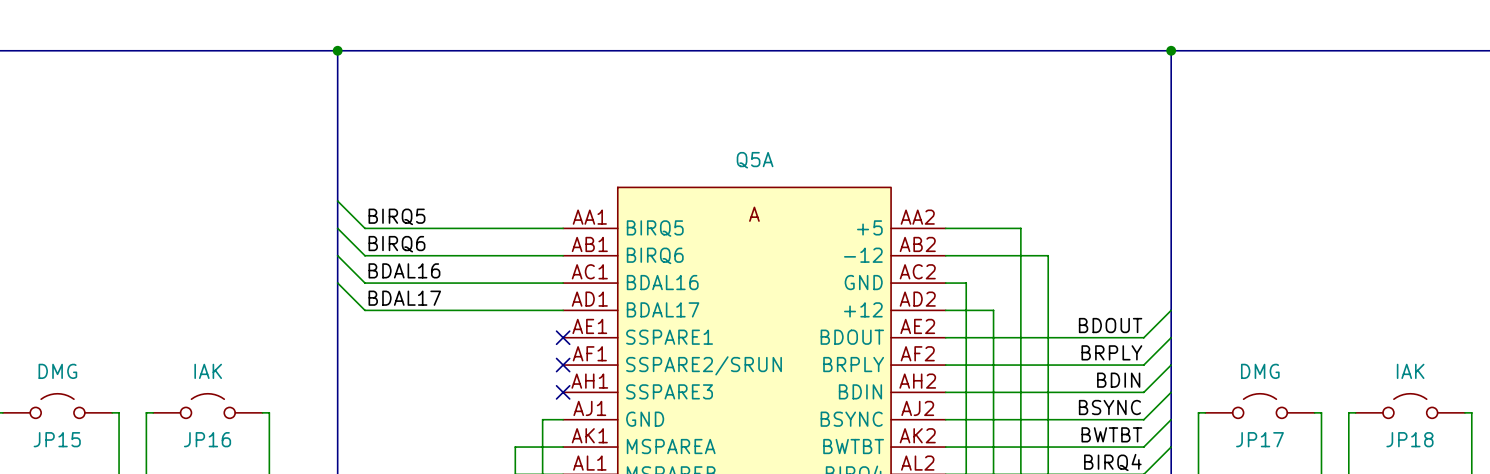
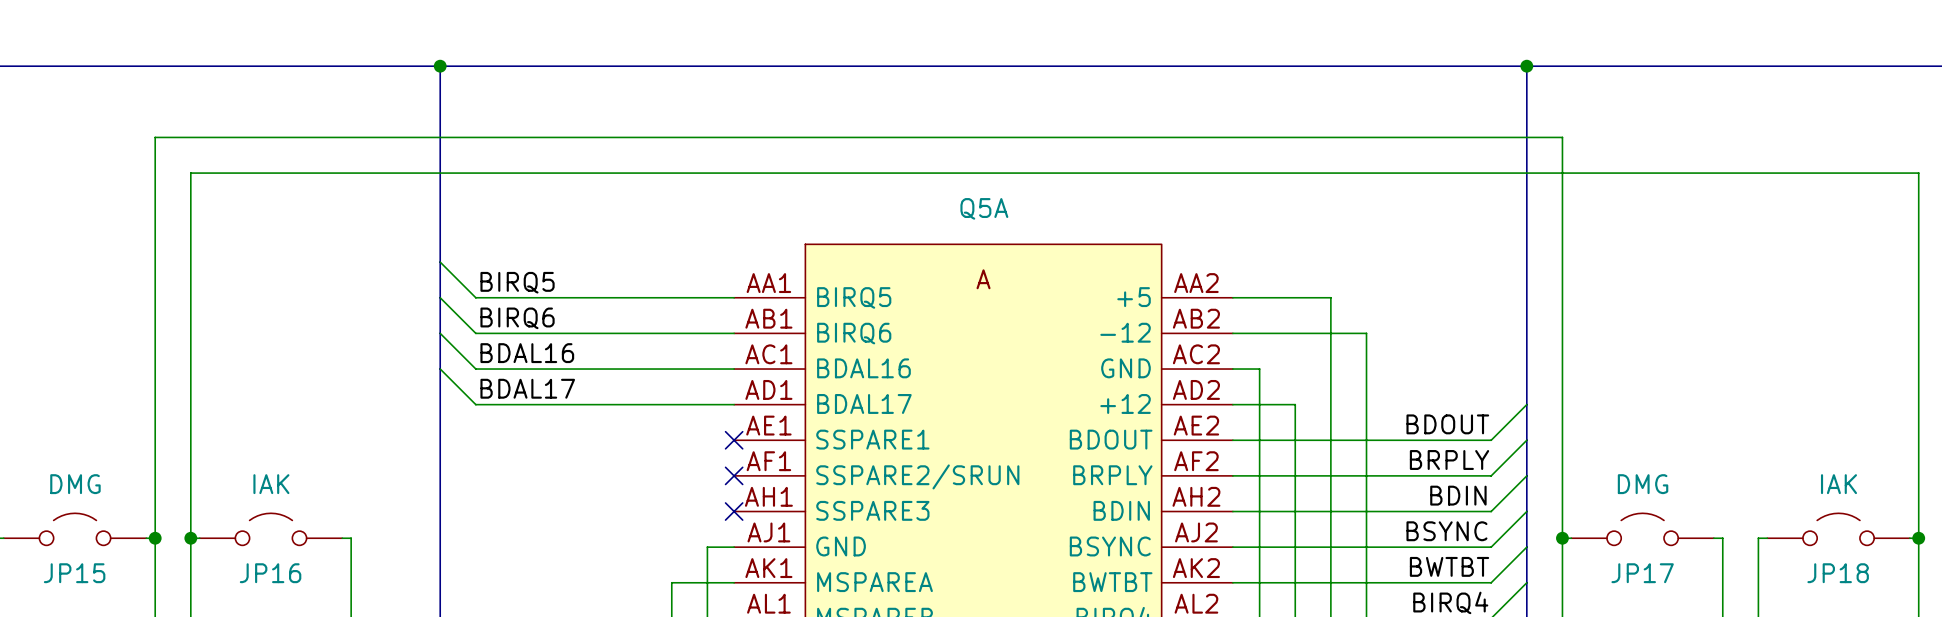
wire: none -> (155, 538) (155, 137) (1562, 137) (1562, 538)
junction: none -> (155, 538)
wire: none -> (190, 538) (190, 173) (1918, 173) (1918, 538)
junction: none -> (190, 538)
junction: none -> (1562, 538)
junction: none -> (1918, 538)

